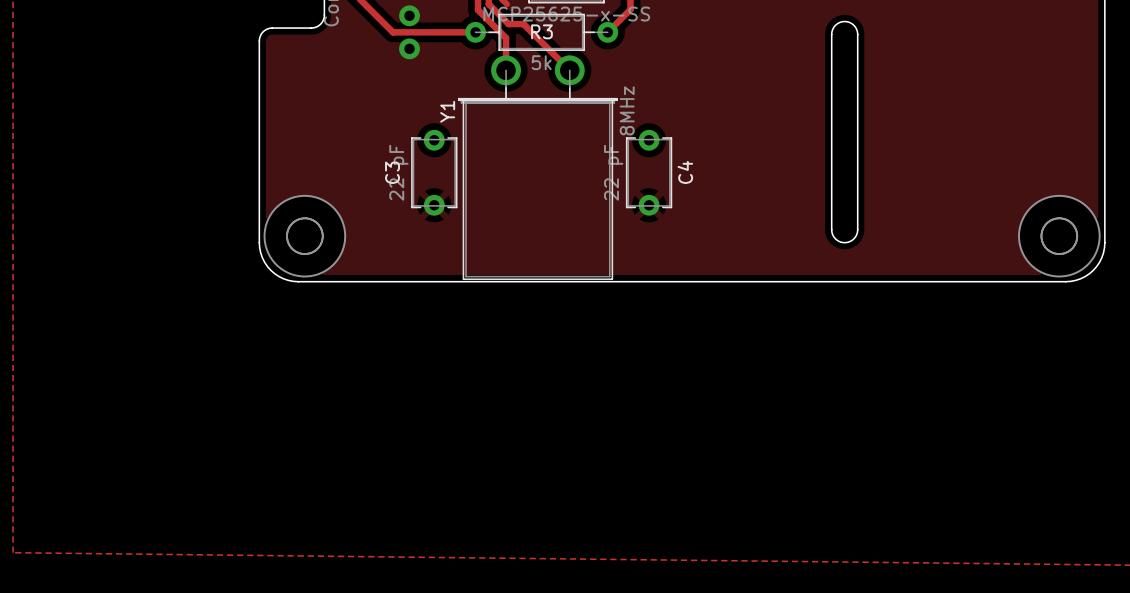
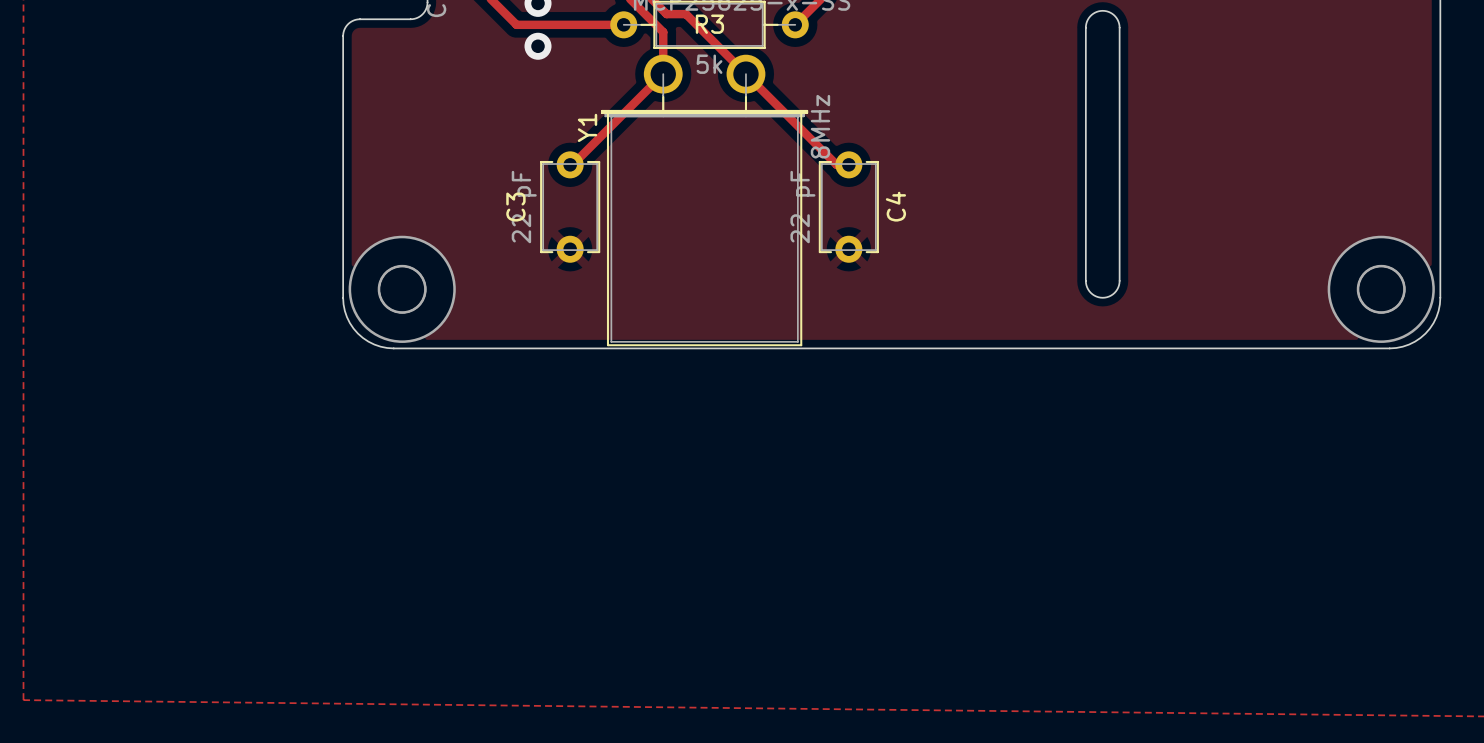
track: none -> (663, 74) (572, 164) (570, 164)
track: none -> (745, 74) (836, 164) (848, 164)

